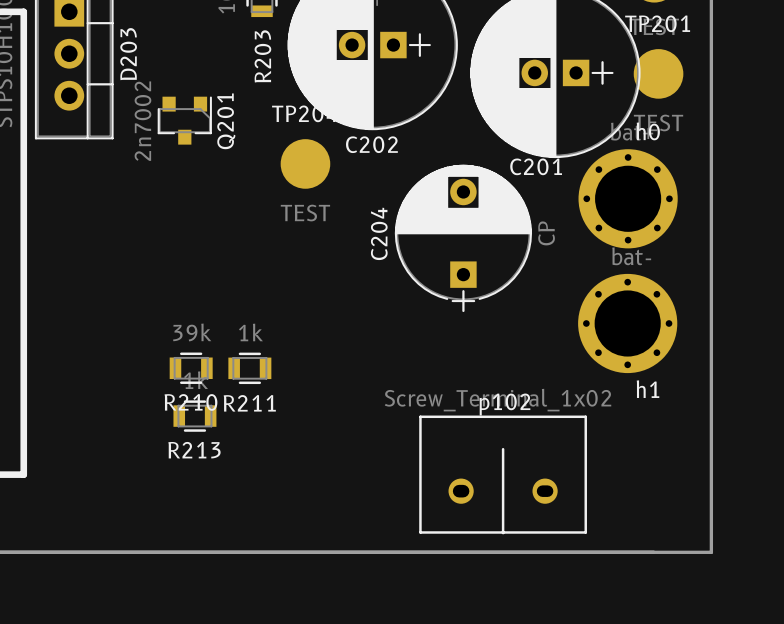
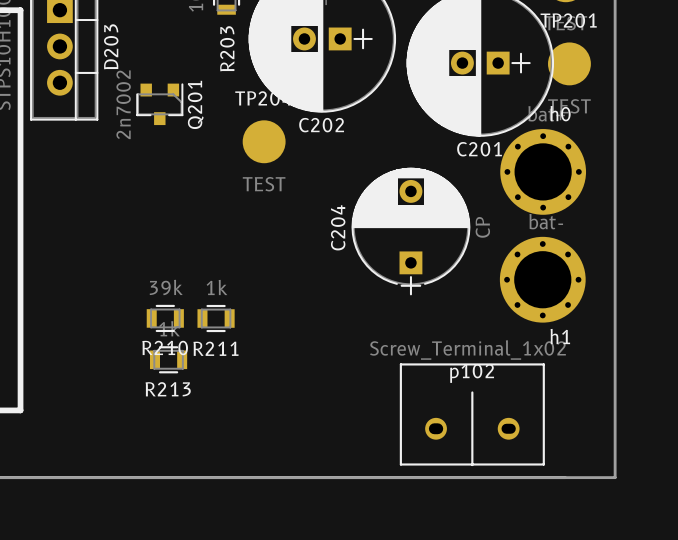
C201 name position: C201 (536, 166) -> C201 (479, 149)
C204 position: (463, 238) -> (410, 231)
p102 name position: p102 (505, 404) -> p102 (472, 373)
p102 position: (503, 474) -> (472, 414)

